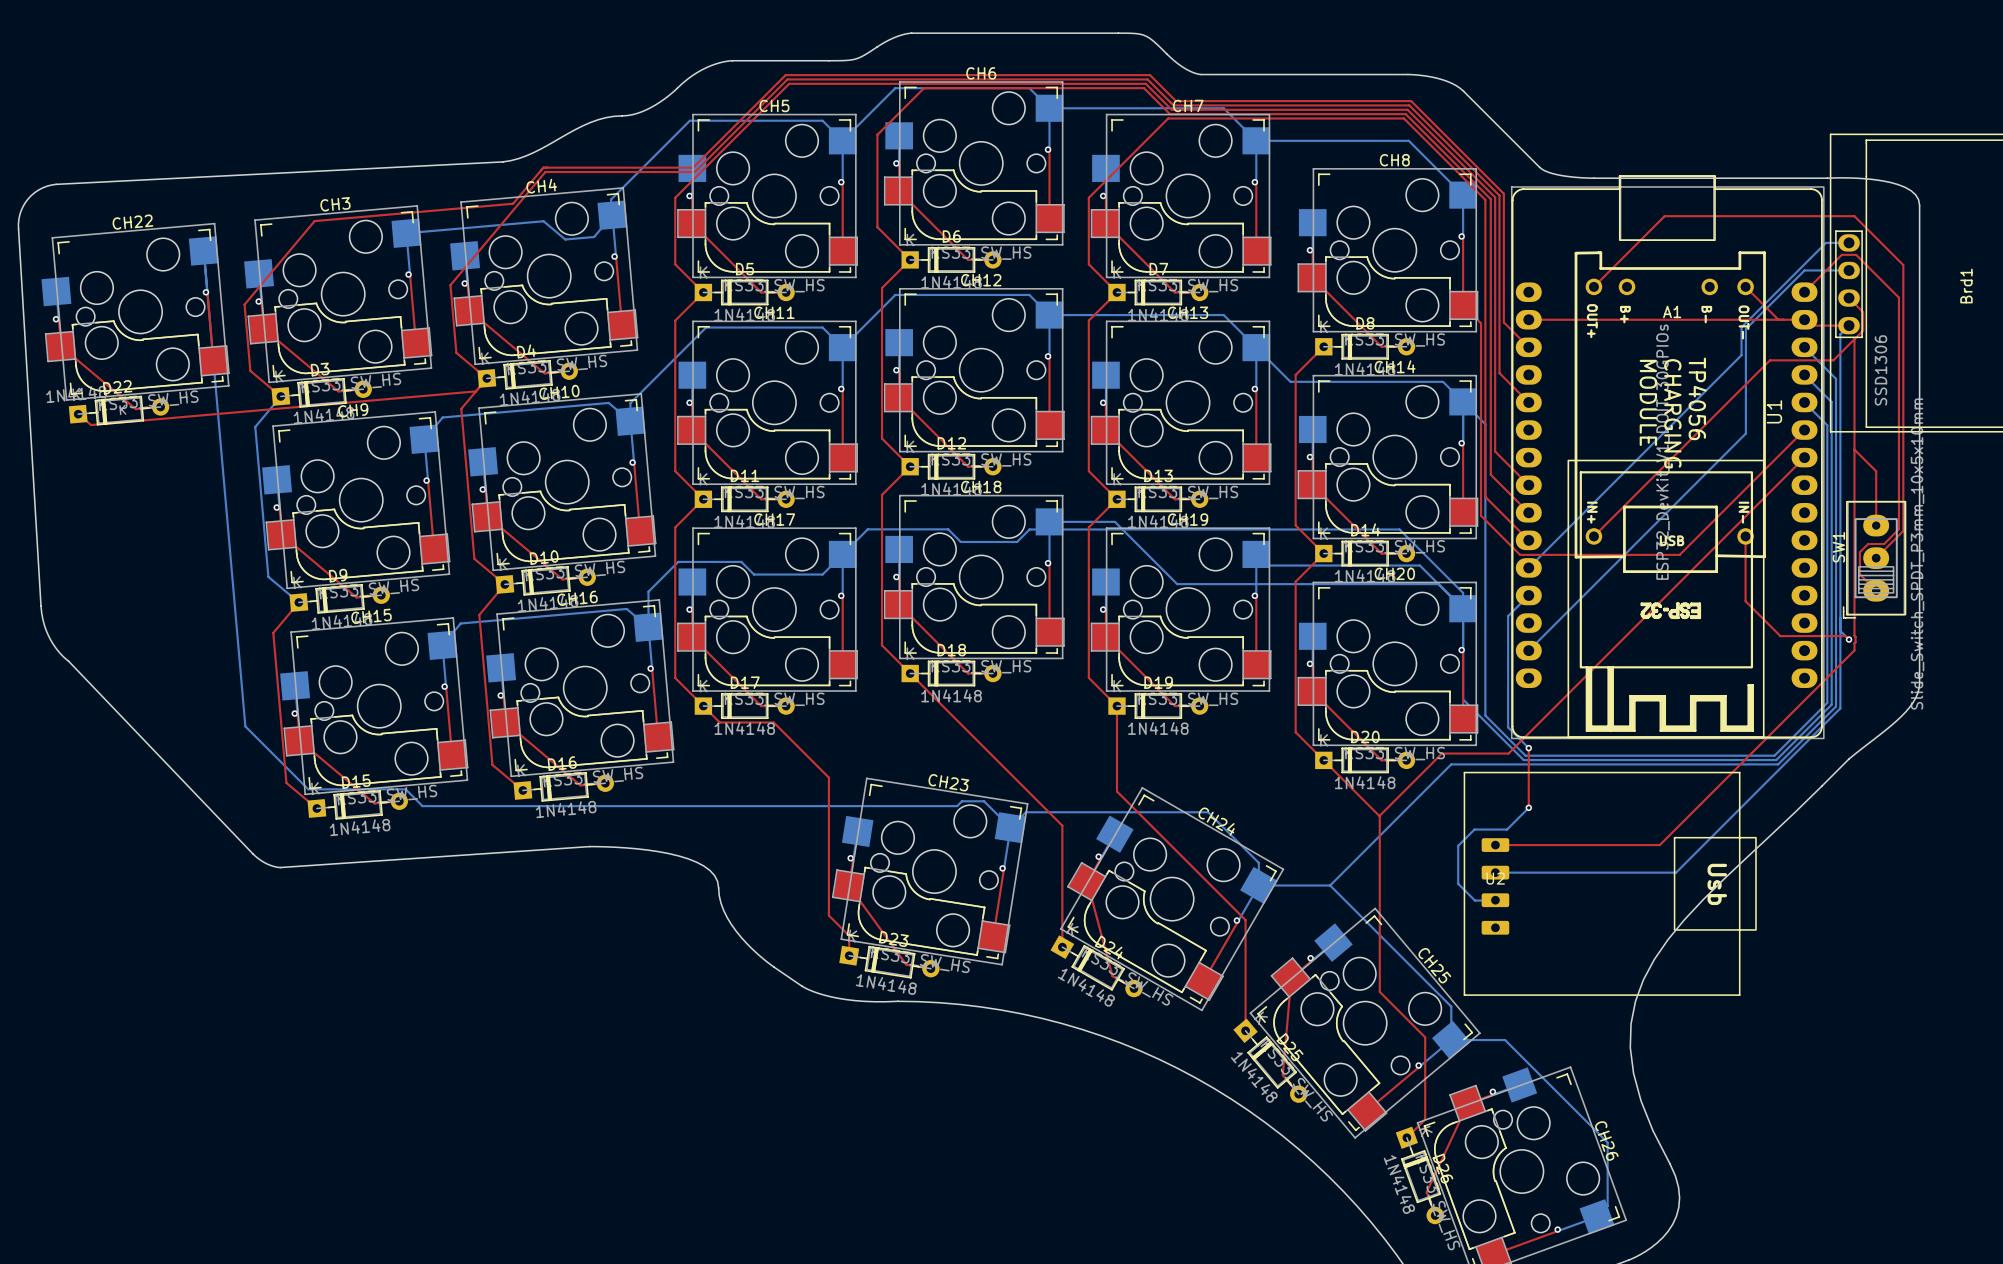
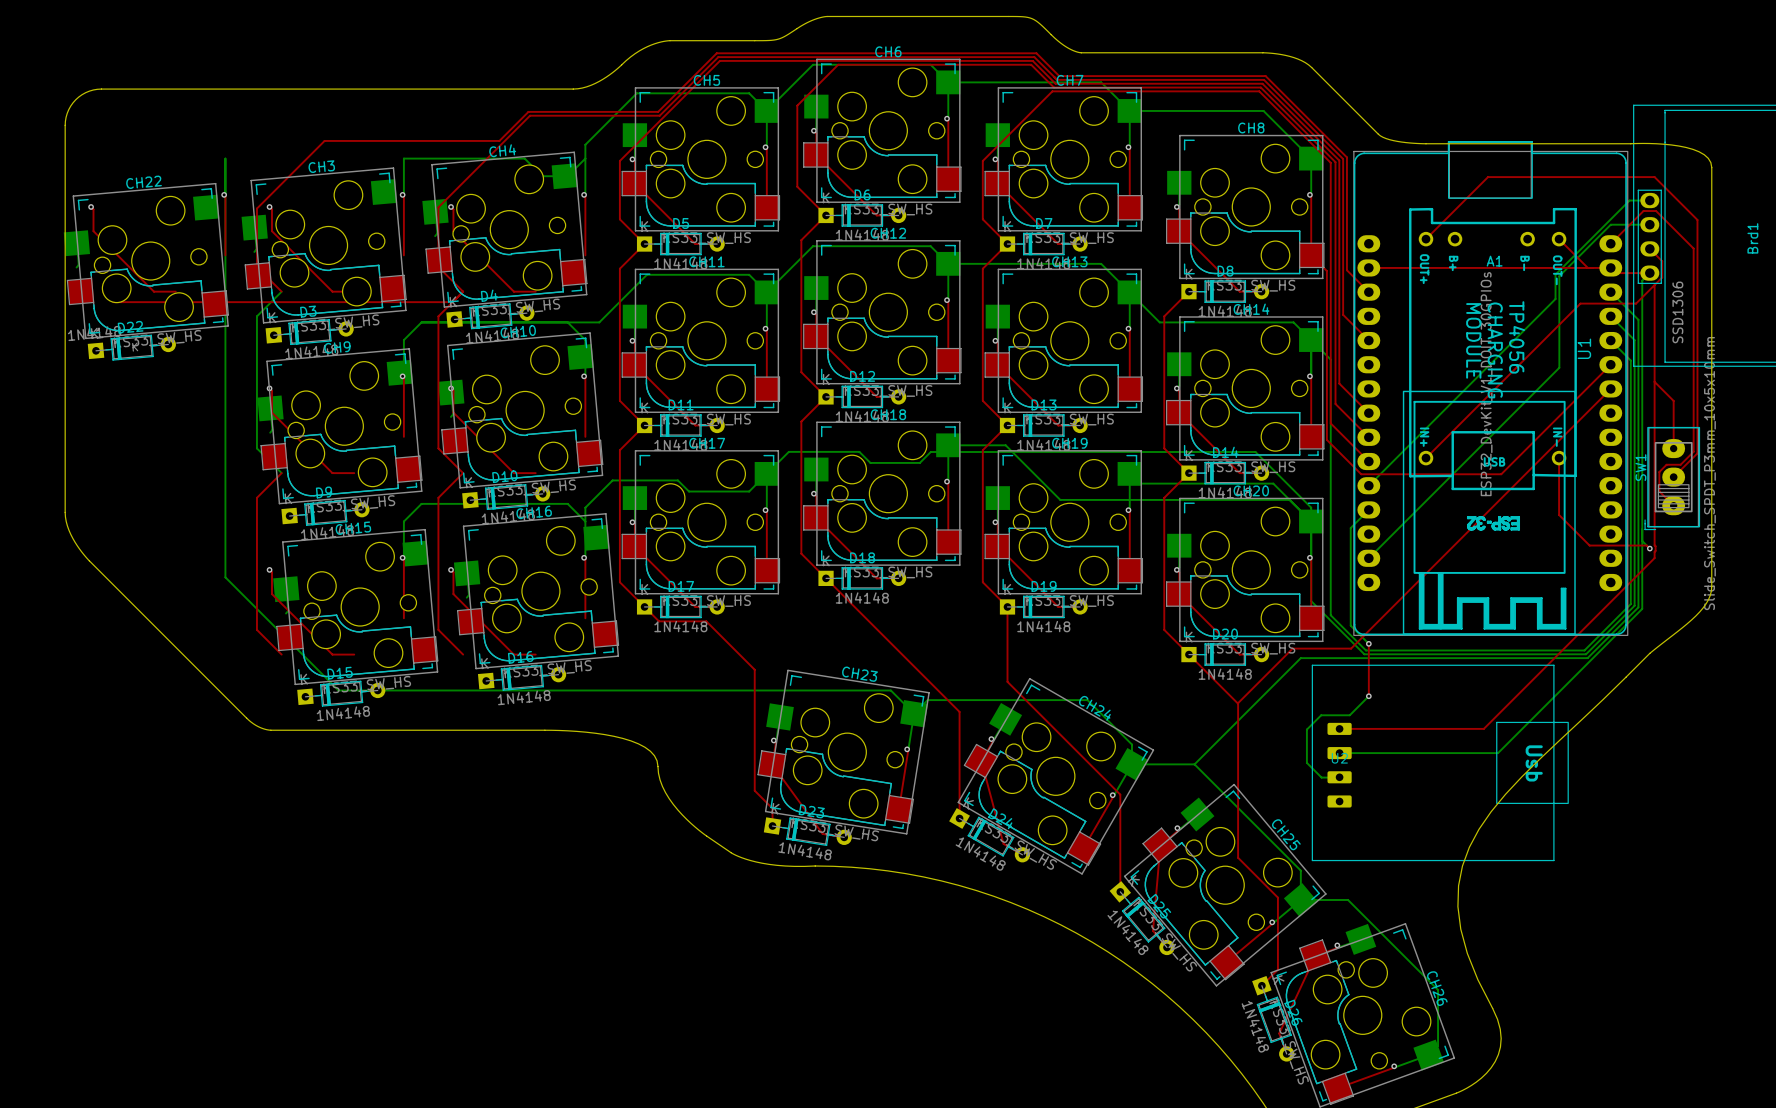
board edge: (622, 115) (605, 117) (590, 122) (533, 152) (502, 161) (51, 185) (38, 190) (28, 198) (21, 210) (18, 224) (41, 606) (46, 630) (60, 653) (252, 853) (269, 865) (280, 867) (589, 846) -> (573, 89) (97, 89) (85, 92) (75, 99) (67, 113) (65, 125) (65, 512) (70, 534) (83, 554) (246, 718) (261, 728) (270, 730) (544, 730)
bottom track: (694, 120) (689, 120) (611, 199) (614, 256) -> (636, 93) (585, 144) (584, 194)
top track: (718, 141) (693, 167) (543, 167) (513, 203) -> (658, 111) (528, 111) (499, 141)
top track: (720, 146) (694, 172) (545, 172) (450, 285) (456, 352) (486, 378) (461, 408) (474, 558) (504, 584) (479, 614) (492, 764) (522, 790) -> (659, 115) (530, 115) (438, 207) (438, 266) (463, 291) (438, 316) (438, 448) (463, 473) (438, 497) (438, 629) (463, 654)
top track: none -> (499, 140) (324, 140) (256, 208) (256, 266) (281, 291)
bottom track: none -> (585, 158) (567, 176) (542, 176) (524, 158) (403, 158) (402, 194)
top track: (512, 203) (314, 221) (244, 304) (250, 370) (280, 396) -> none
bottom track: (612, 215) (594, 236) (565, 239) (543, 221) (406, 233) (408, 274) -> none
top track: none -> (224, 194) (225, 255)
via: none -> (224, 194)
top track: none -> (402, 194) (403, 255)
via: none -> (402, 194)
top track: none -> (584, 194) (585, 255)
top track: none -> (91, 206) (93, 209) (93, 231) (153, 291) (175, 291)
via: none -> (91, 206)
bottom track: (203, 250) (245, 726) (308, 789) (405, 789) (422, 806) (957, 806) (962, 801) -> (225, 158) (225, 577) (338, 690) (871, 690)
top track: none -> (269, 206) (271, 209) (271, 231) (332, 291) (354, 291)
via: none -> (269, 206)
top track: none -> (451, 206) (453, 209) (453, 231) (513, 291) (535, 291)
via: none -> (451, 206)
top track: (614, 256) (622, 325) -> none
via position: (614, 256) -> (584, 194)
top track: (408, 274) (416, 343) -> none
via: (408, 274) -> none
top track: (464, 283) (467, 286) (469, 310) (544, 373) (569, 371) -> none
via: (464, 283) -> none
top track: (205, 292) (213, 360) -> none
via: (205, 292) -> none
top track: (258, 301) (261, 304) (263, 328) (338, 391) (363, 389) -> none
via: (258, 301) -> none
top track: (56, 319) (59, 321) (61, 346) (135, 409) (160, 406) -> none
via: (56, 319) -> none
top track: none -> (103, 291) (113, 302) (452, 302)
bottom track: none -> (281, 291) (256, 316) (256, 448) (281, 473)
bottom track: none -> (567, 322) (585, 340) (584, 376)
bottom track: (651, 381) (630, 403) (630, 421) -> (599, 322) (421, 322) (403, 340) (402, 376)
top track: (476, 391) (91, 425) (78, 414) -> none
bottom track: (280, 396) (255, 426) (268, 576) (298, 602) -> none
bottom track: (630, 421) (632, 462) -> none
bottom track: (630, 421) (608, 402) (442, 417) (424, 439) (426, 480) -> none
top track: none -> (402, 376) (403, 436)
via: none -> (402, 376)
top track: none -> (584, 376) (585, 436)
top track: none -> (269, 388) (271, 390) (271, 412) (332, 473) (354, 473)
top track: none -> (451, 388) (453, 390) (453, 412) (513, 473) (535, 473)
via: none -> (451, 388)
top track: (632, 462) (640, 531) -> none
via position: (632, 462) -> (584, 376)
top track: (426, 480) (434, 549) -> none
via: (426, 480) -> none
top track: (482, 489) (485, 492) (487, 516) (562, 579) (587, 577) -> none
via: (482, 489) -> none
top track: (276, 507) (279, 510) (281, 534) (356, 597) (381, 595) -> none
via position: (276, 507) -> (269, 388)
top track: none -> (281, 473) (256, 497) (256, 629) (281, 654)
bottom track: (678, 561) (648, 591) (648, 627) -> (622, 480) (612, 480) (585, 507) (584, 557)
top track: (298, 602) (273, 632) (286, 782) (316, 808) -> none
bottom track: none -> (585, 521) (567, 503) (421, 503) (403, 521) (402, 557)
bottom track: (648, 627) (650, 668) -> none
bottom track: (648, 627) (626, 608) (460, 623) (442, 645) (444, 686) -> none
top track: none -> (402, 557) (403, 618)
via: none -> (402, 557)
top track: none -> (584, 557) (585, 618)
top track: none -> (269, 569) (271, 572) (271, 594) (332, 654) (354, 654)
top track: none -> (451, 569) (453, 572) (453, 594) (513, 654) (535, 654)
via: none -> (451, 569)
top track: (650, 668) (658, 737) -> none
via position: (650, 668) -> (584, 557)
top track: (444, 686) (452, 755) -> none
via: (444, 686) -> none
top track: (500, 695) (503, 698) (505, 722) (580, 785) (605, 783) -> none
via: (500, 695) -> none
top track: (294, 713) (297, 716) (299, 740) (374, 803) (399, 801) -> none
via position: (294, 713) -> (269, 569)

